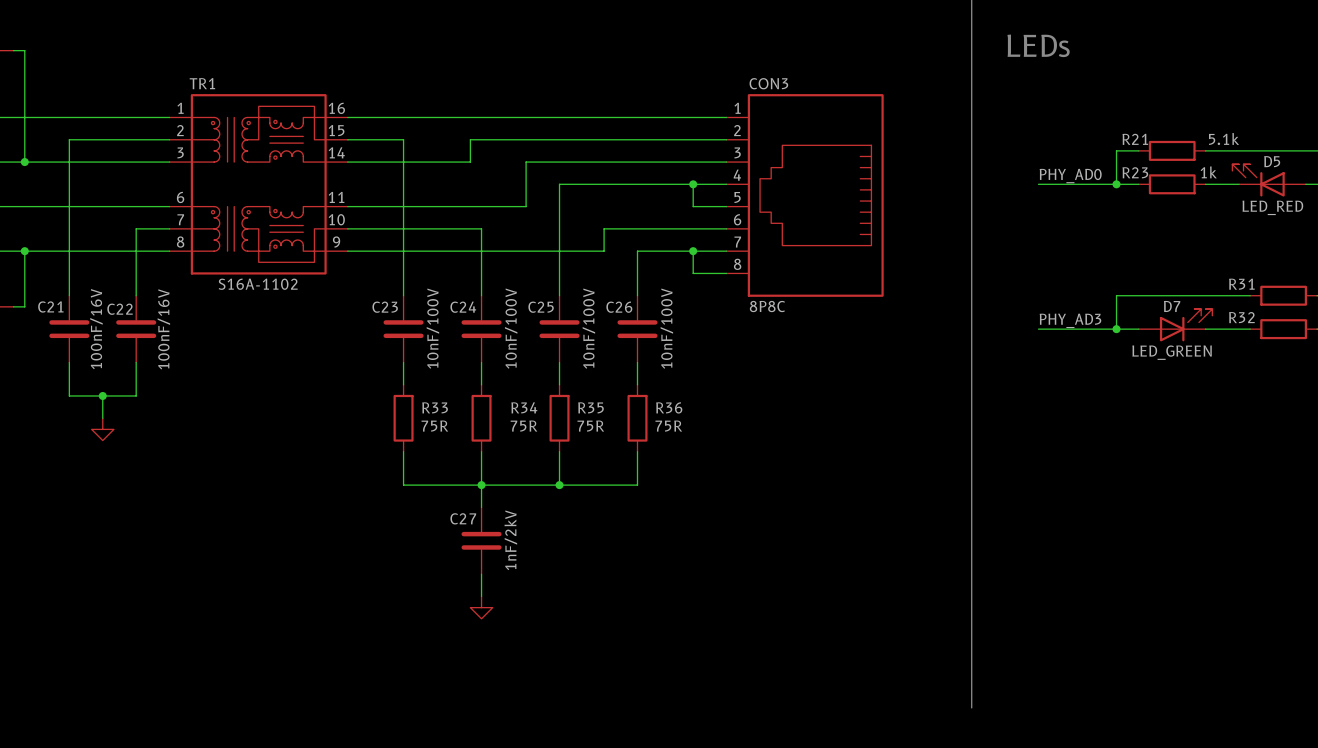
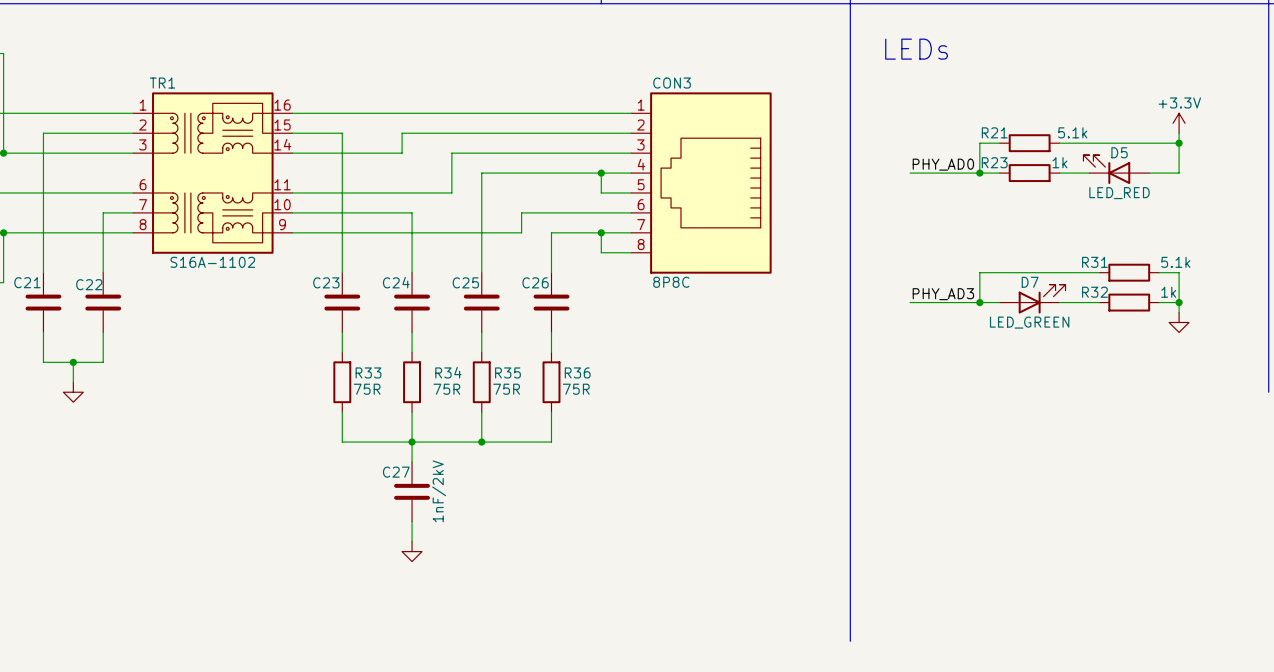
C23 value: 10nF/100V (432, 328) -> none
C24 value: 10nF/100V (511, 328) -> none
C25 value: 10nF/100V (588, 328) -> none
C26 value: 10nF/100V (666, 328) -> none
C21 value: 100nF/16V (96, 329) -> none
C22 value: 100nF/16V (163, 329) -> none

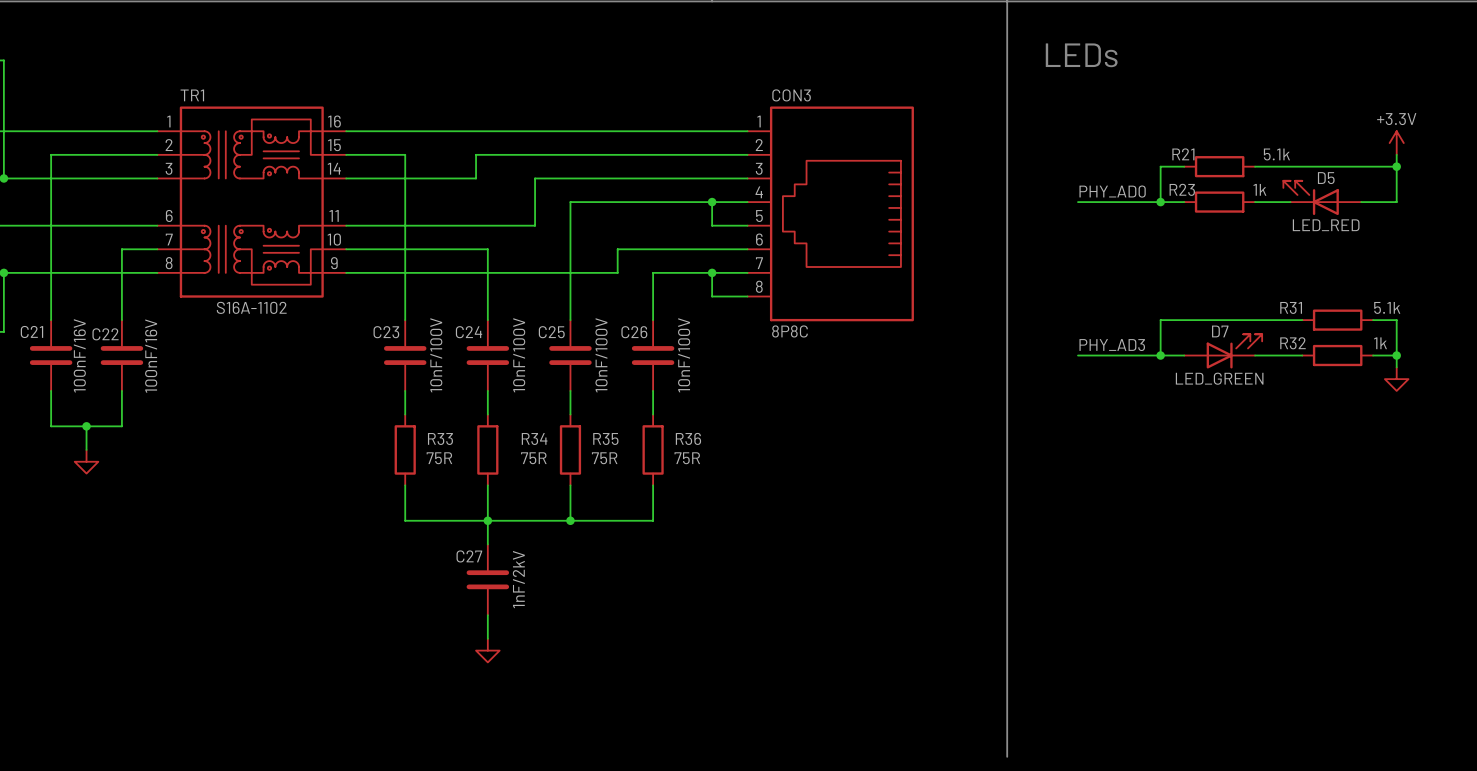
C21 value: none -> 100nF/16V (79, 355)
C22 value: none -> 100nF/16V (151, 356)
C23 value: none -> 10nF/100V (436, 355)
C24 value: none -> 10nF/100V (519, 355)
C25 value: none -> 10nF/100V (601, 355)
C26 value: none -> 10nF/100V (684, 355)

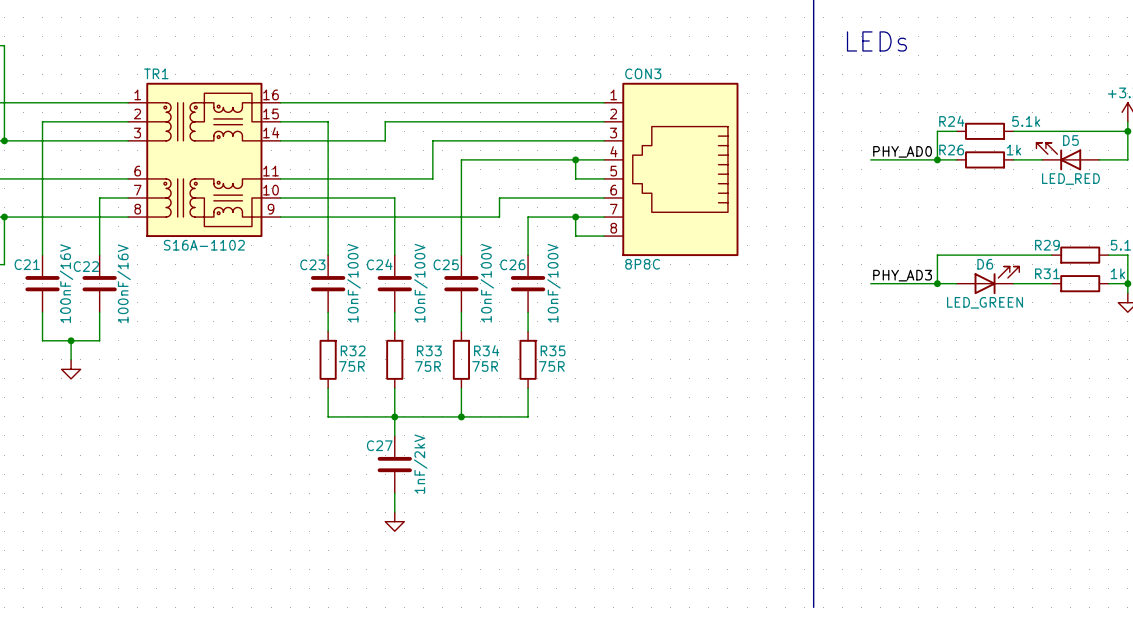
R21 name: R21 (1183, 154) -> R24 (951, 121)
R23 name: R23 (1182, 189) -> R26 (951, 150)
R31 name: R31 (1291, 307) -> R29 (1047, 245)
D7 name: D7 (1220, 331) -> D6 (985, 264)
R32 name: R32 (1292, 343) -> R31 (1047, 273)
R33 name: R33 (440, 438) -> R32 (353, 350)
R34 name: R34 (534, 438) -> R33 (429, 350)
R35 name: R35 (605, 438) -> R34 (486, 350)
R36 name: R36 (688, 438) -> R35 (553, 350)

